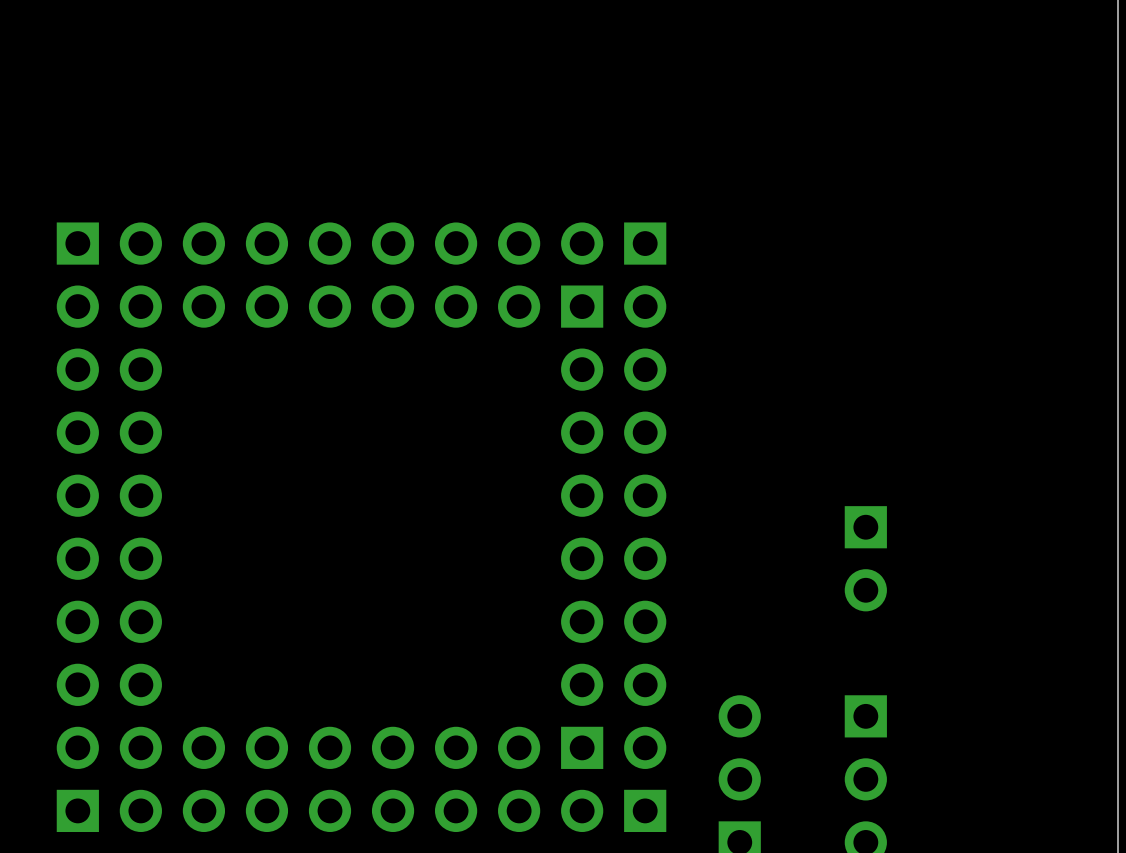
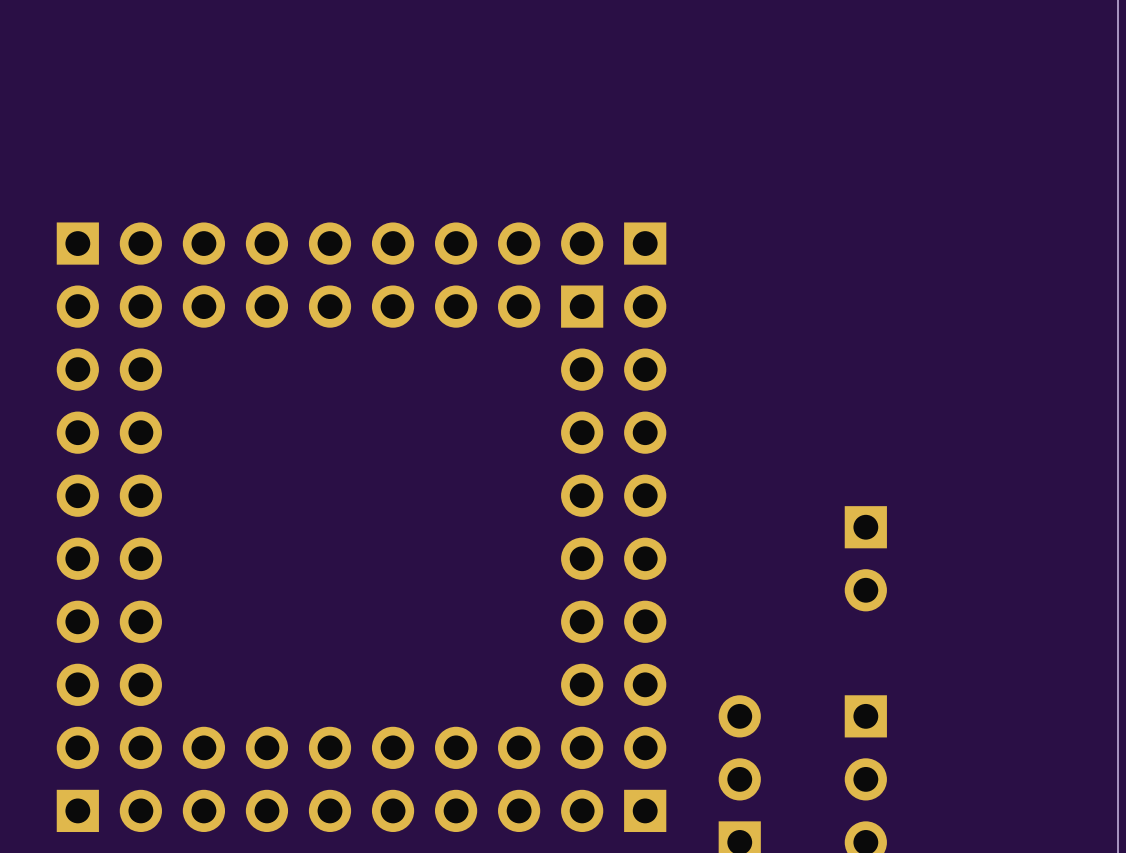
part footprint: [56, 222, 667, 833] -> [56, 222, 667, 833]

